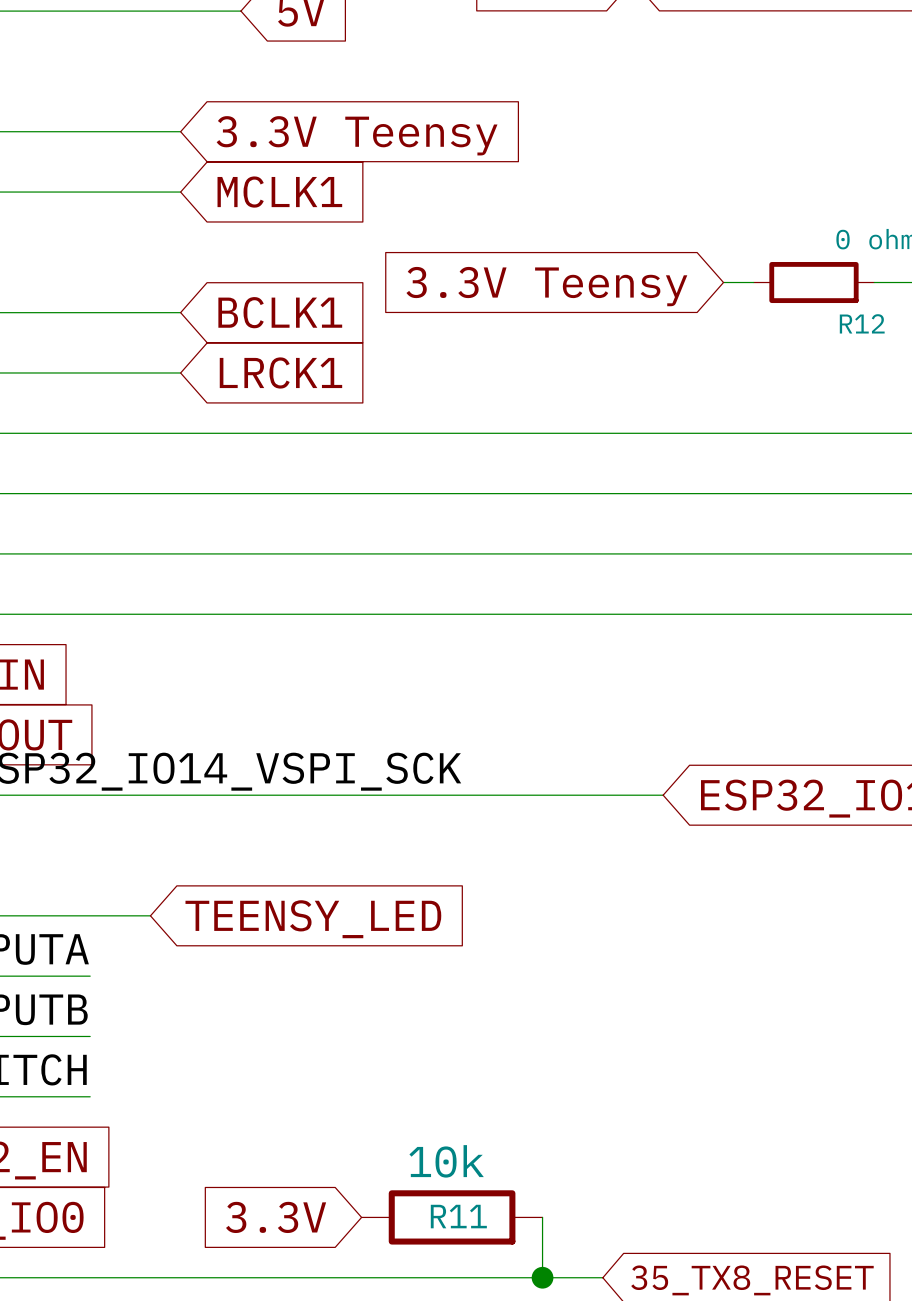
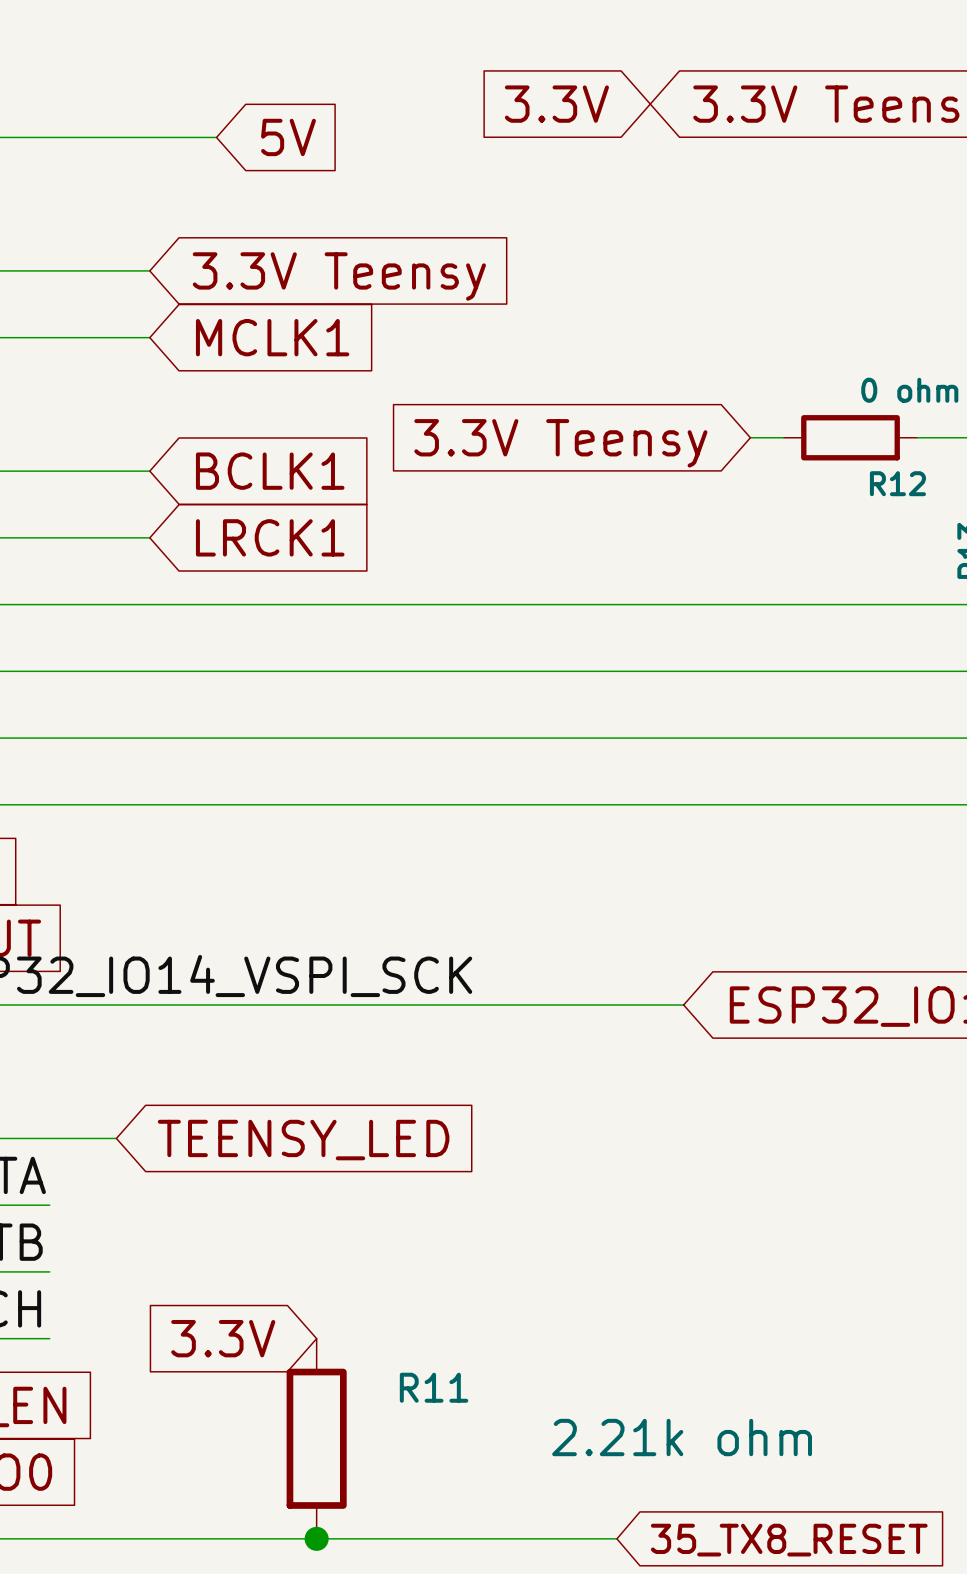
R11 value: 10k (446, 1161) -> 2.21k ohm (682, 1437)
R11 name position: R11 (458, 1216) -> R11 (434, 1387)
global label position: 3.3V (276, 1217) -> 3.3V (223, 1338)
R11 rotation: 0° (452, 1217) -> 90° clockwise (316, 1438)
R11 position: (452, 1217) -> (316, 1438)
wire: (542, 1217) (542, 1277) -> none
junction: none -> (316, 1538)
junction: (542, 1277) -> none

